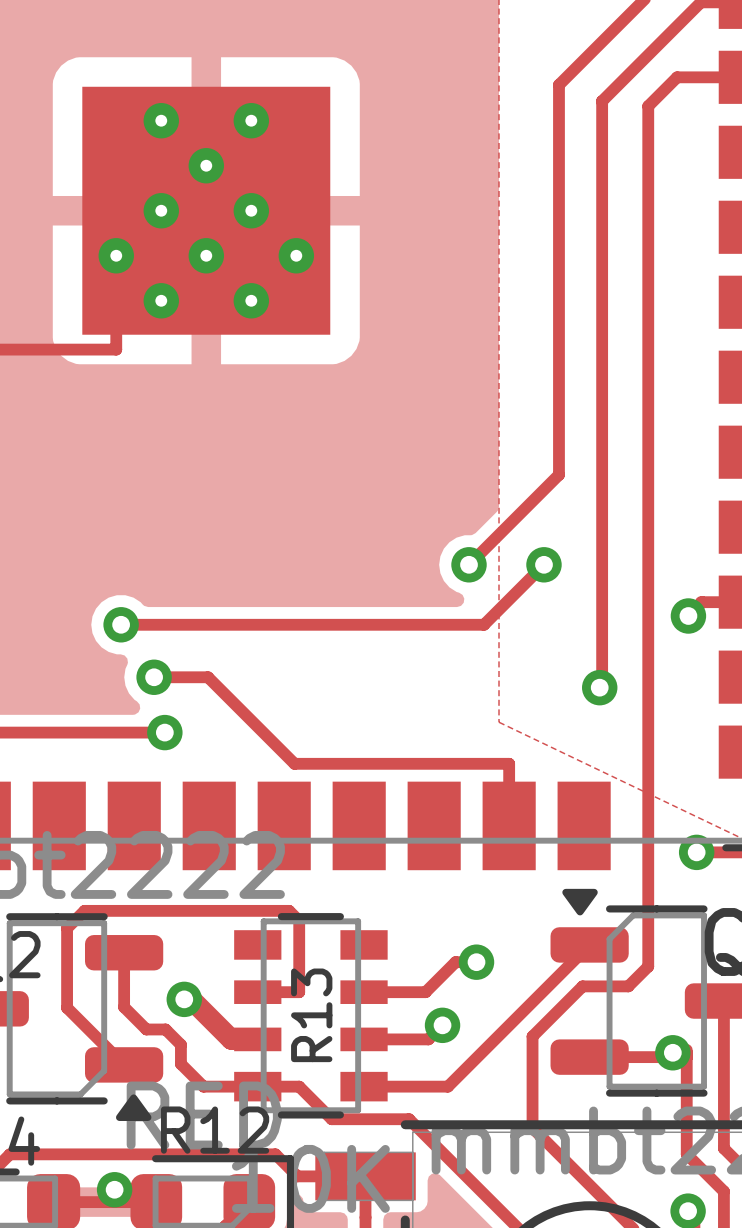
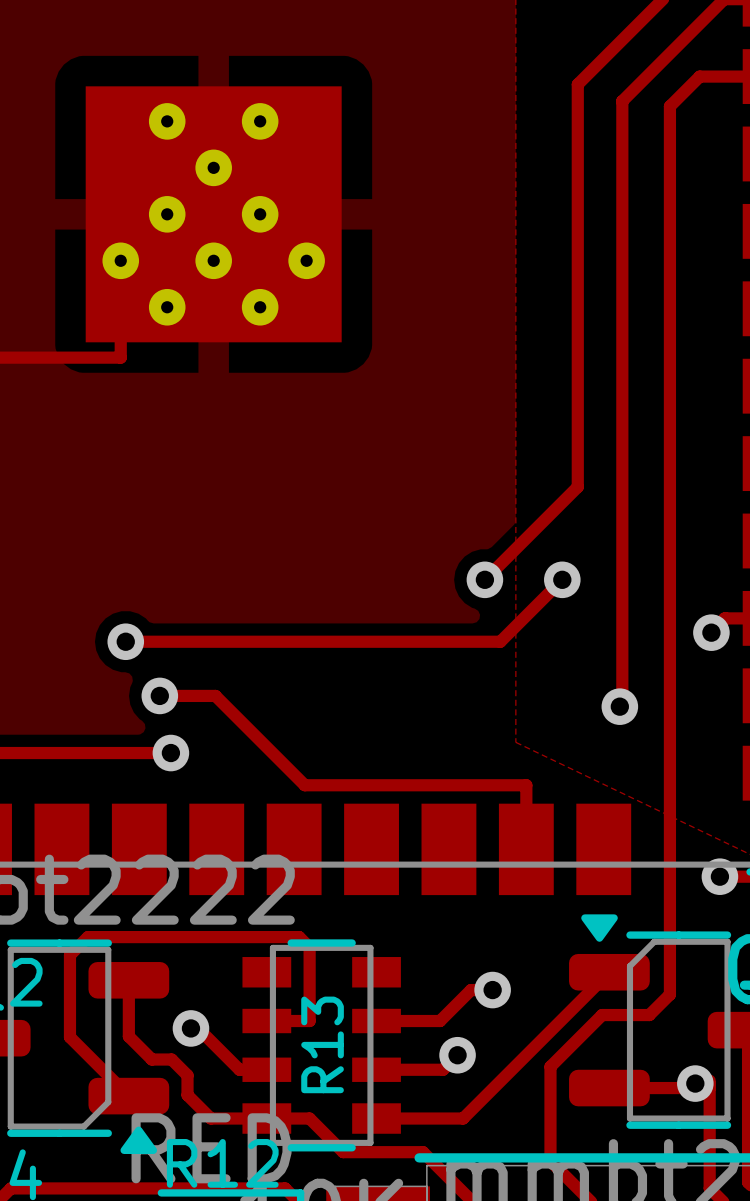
track width: thick (184, 999) (191, 999) (231, 1039) (257, 1039) -> thin (190, 1028) (198, 1028) (239, 1069) (266, 1069)

